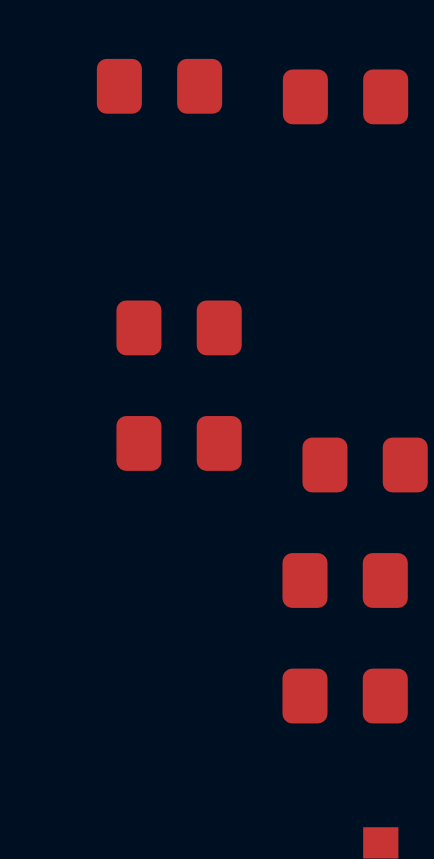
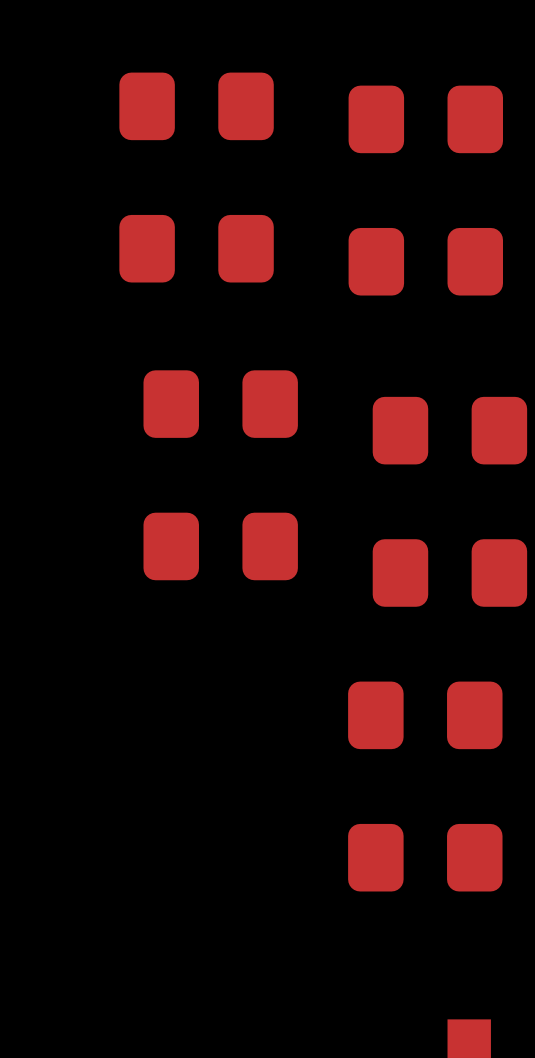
part: none -> (196, 248)
part: none -> (425, 261)
part: none -> (449, 430)

